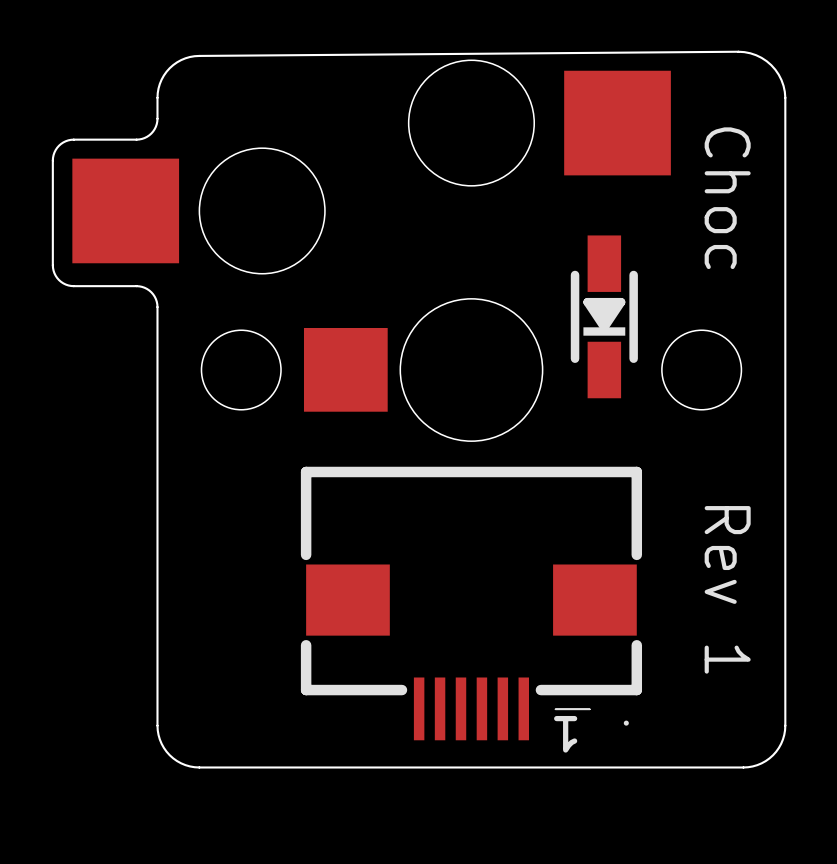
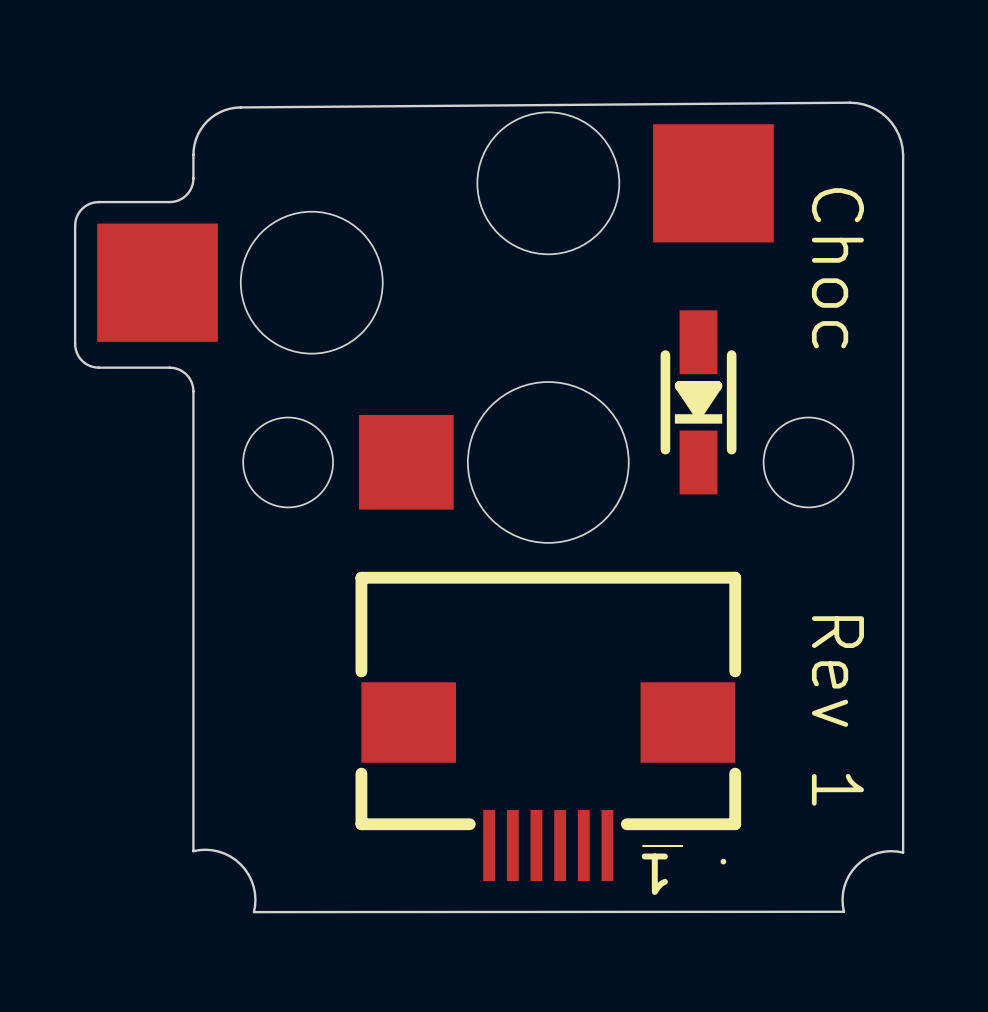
board edge: (157, 713) (158, 734) (166, 751) (181, 763) (199, 767) (748, 767) (765, 761) (776, 751) (784, 734) (785, 715) -> (193, 851) (206, 849) (218, 851) (230, 856) (240, 864) (248, 874) (253, 886) (255, 899) (253, 912) (843, 911) (842, 899) (844, 886) (849, 875) (856, 865) (866, 857) (878, 852) (890, 851) (903, 852)

